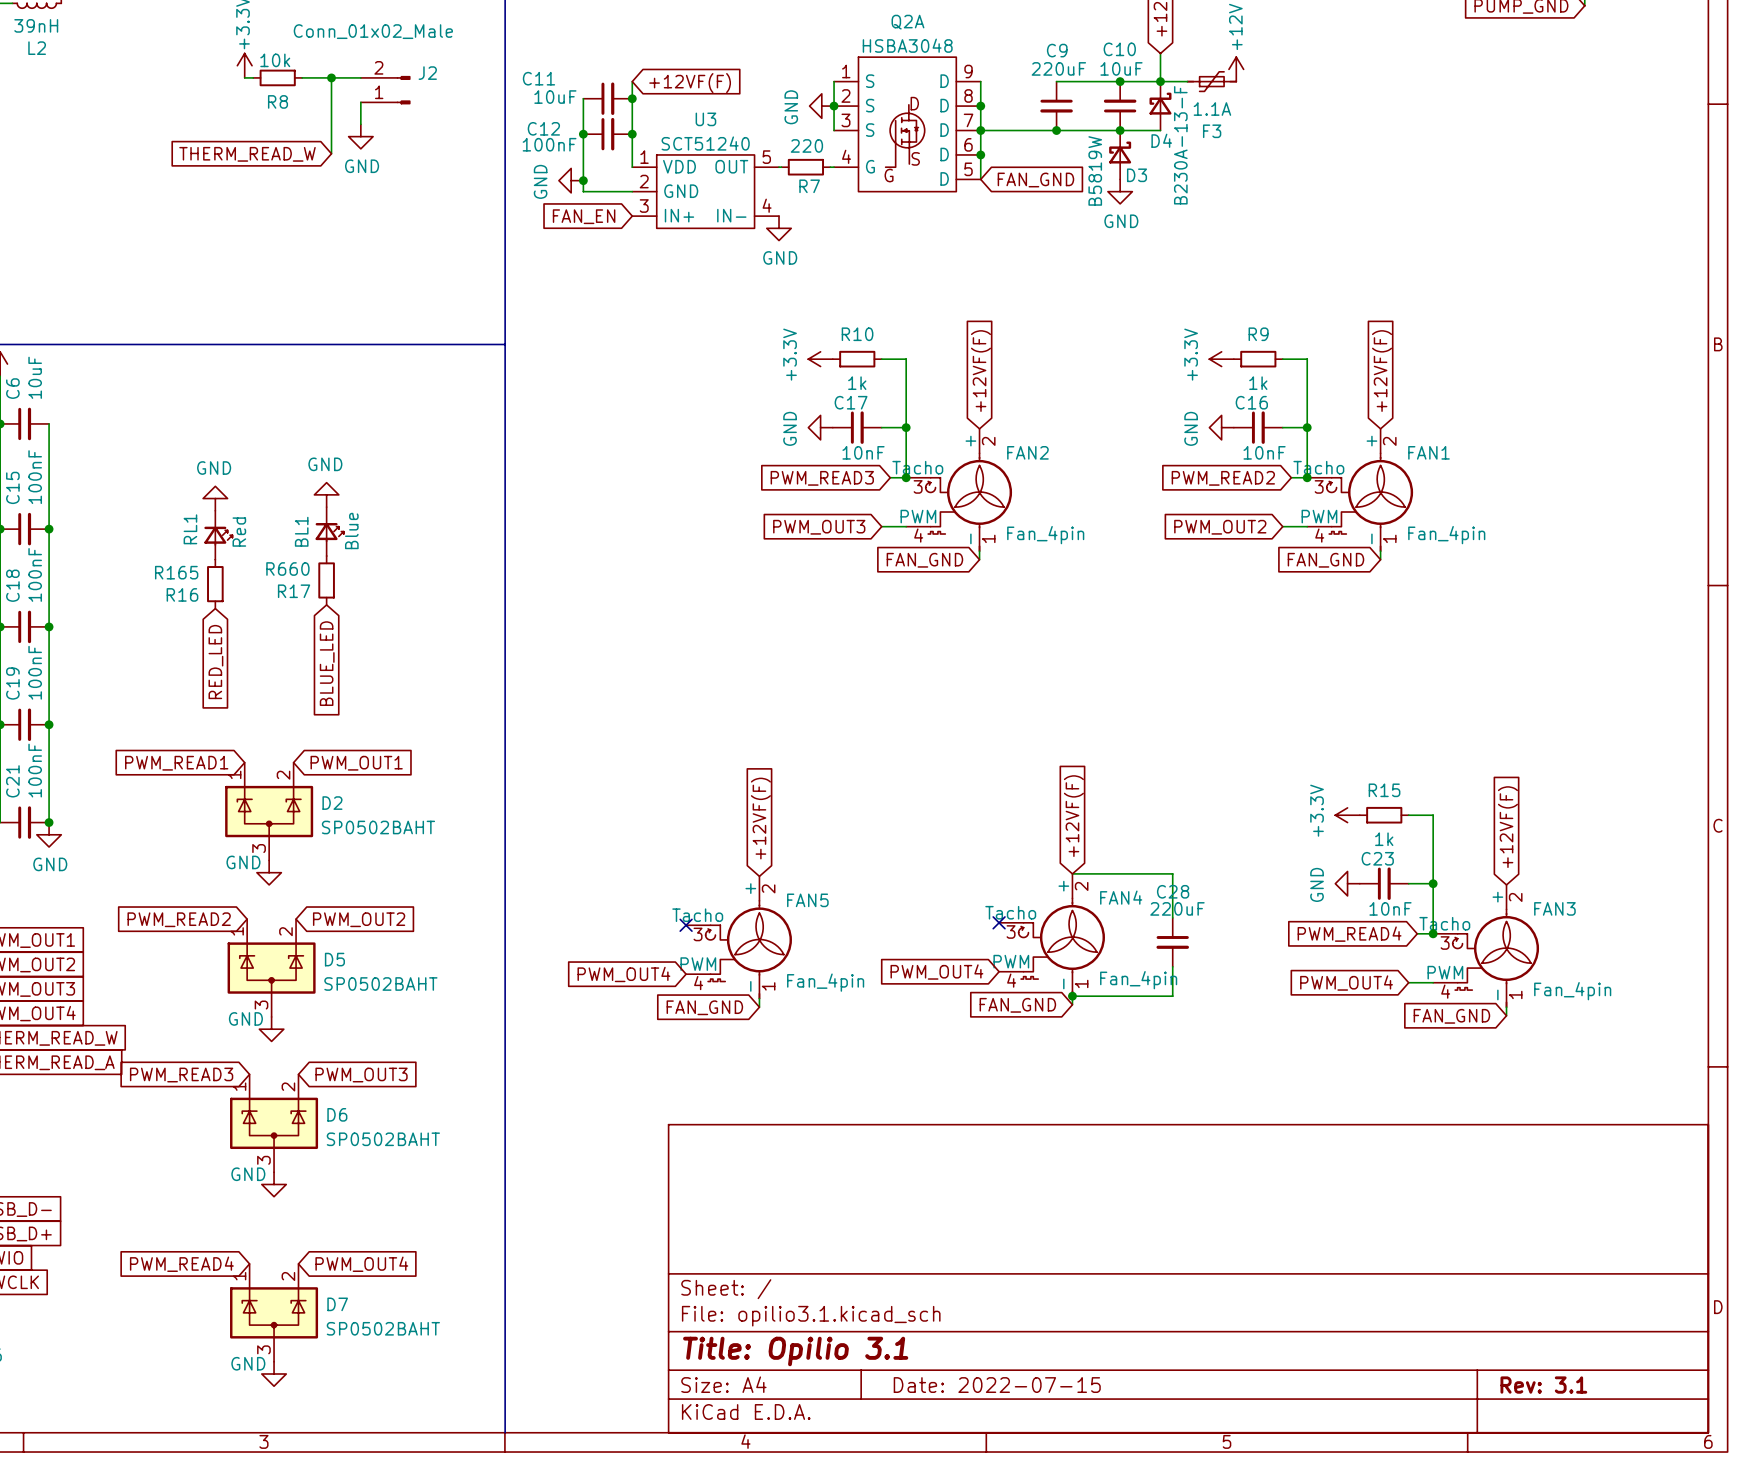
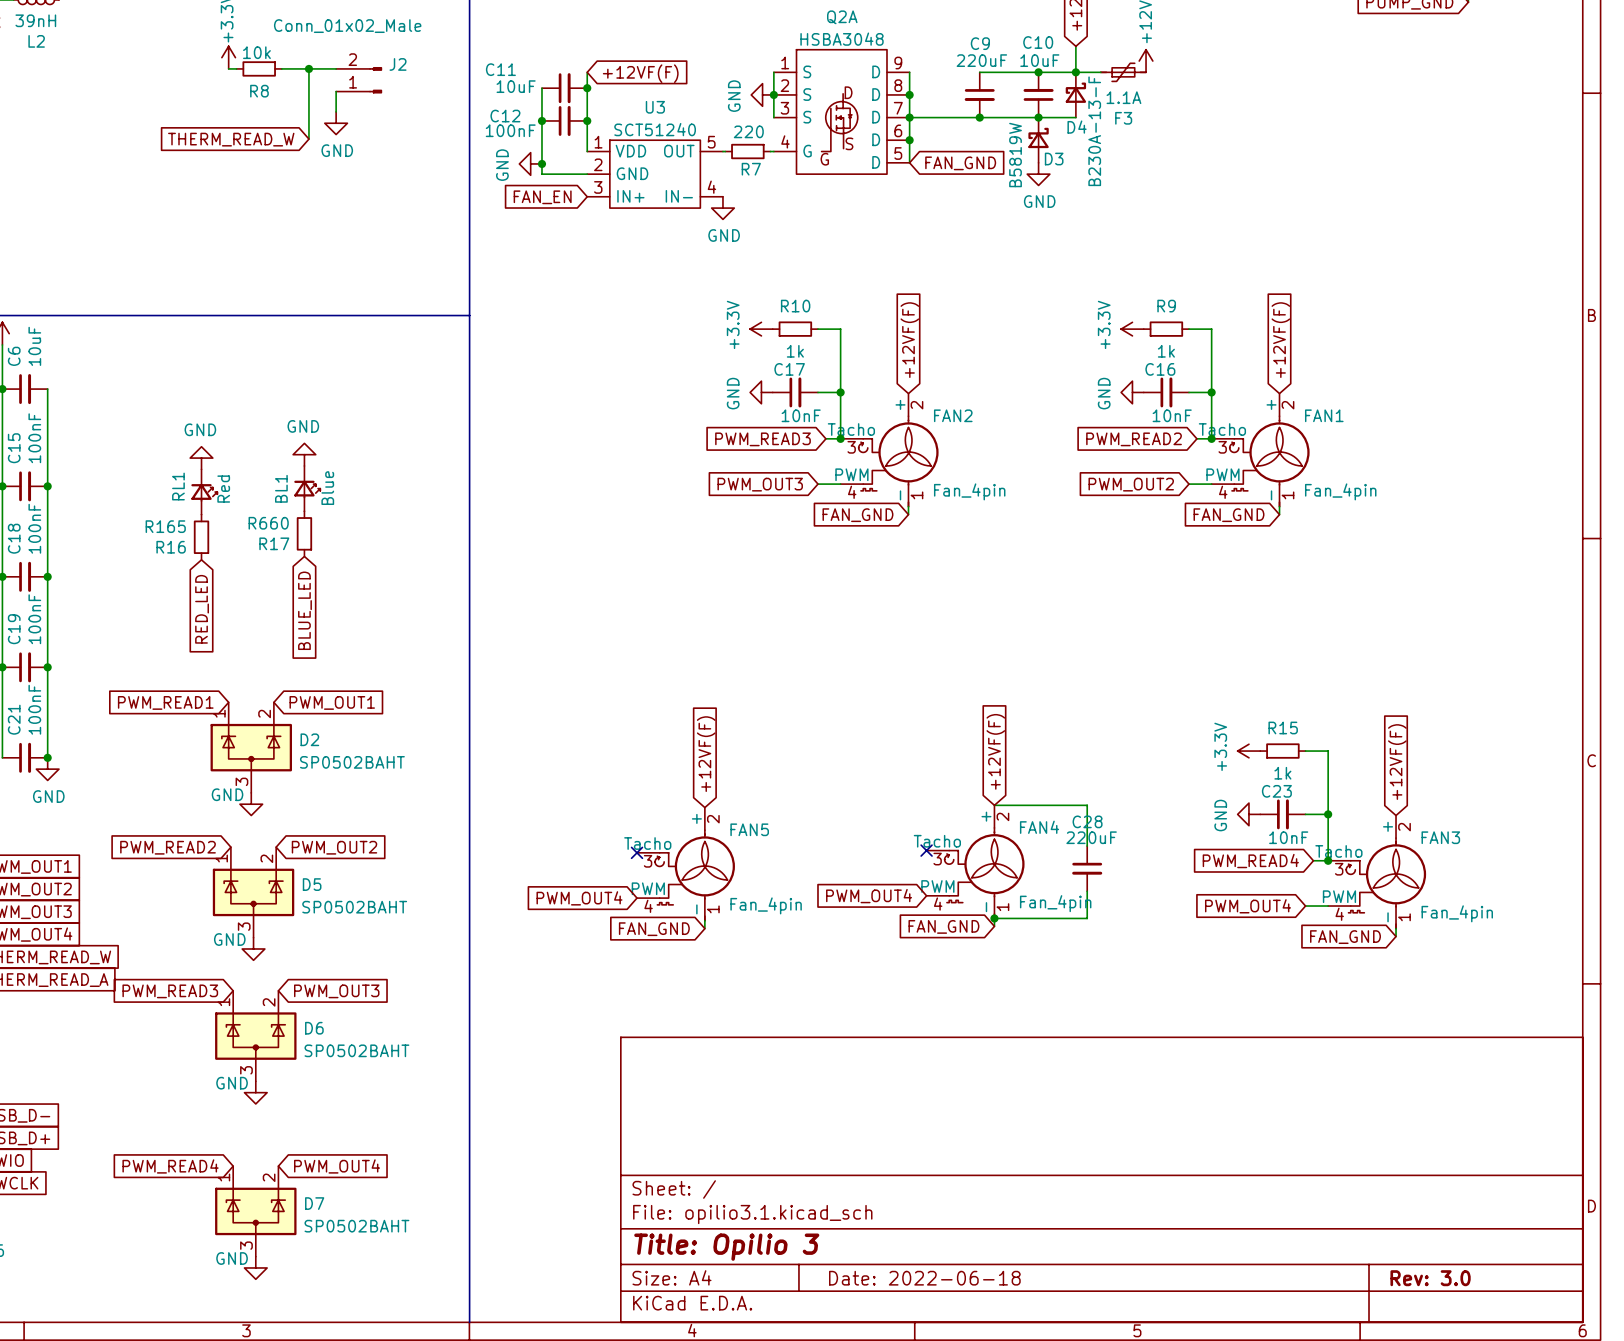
title block: Title: Opilio 3.1 (795, 1351) -> Title: Opilio 3 (726, 1247)
title block: Date: 2022-07-15 (997, 1385) -> Date: 2022-06-18 (924, 1278)
title block: Rev: 3.1 (1543, 1385) -> Rev: 3.0 (1430, 1278)

